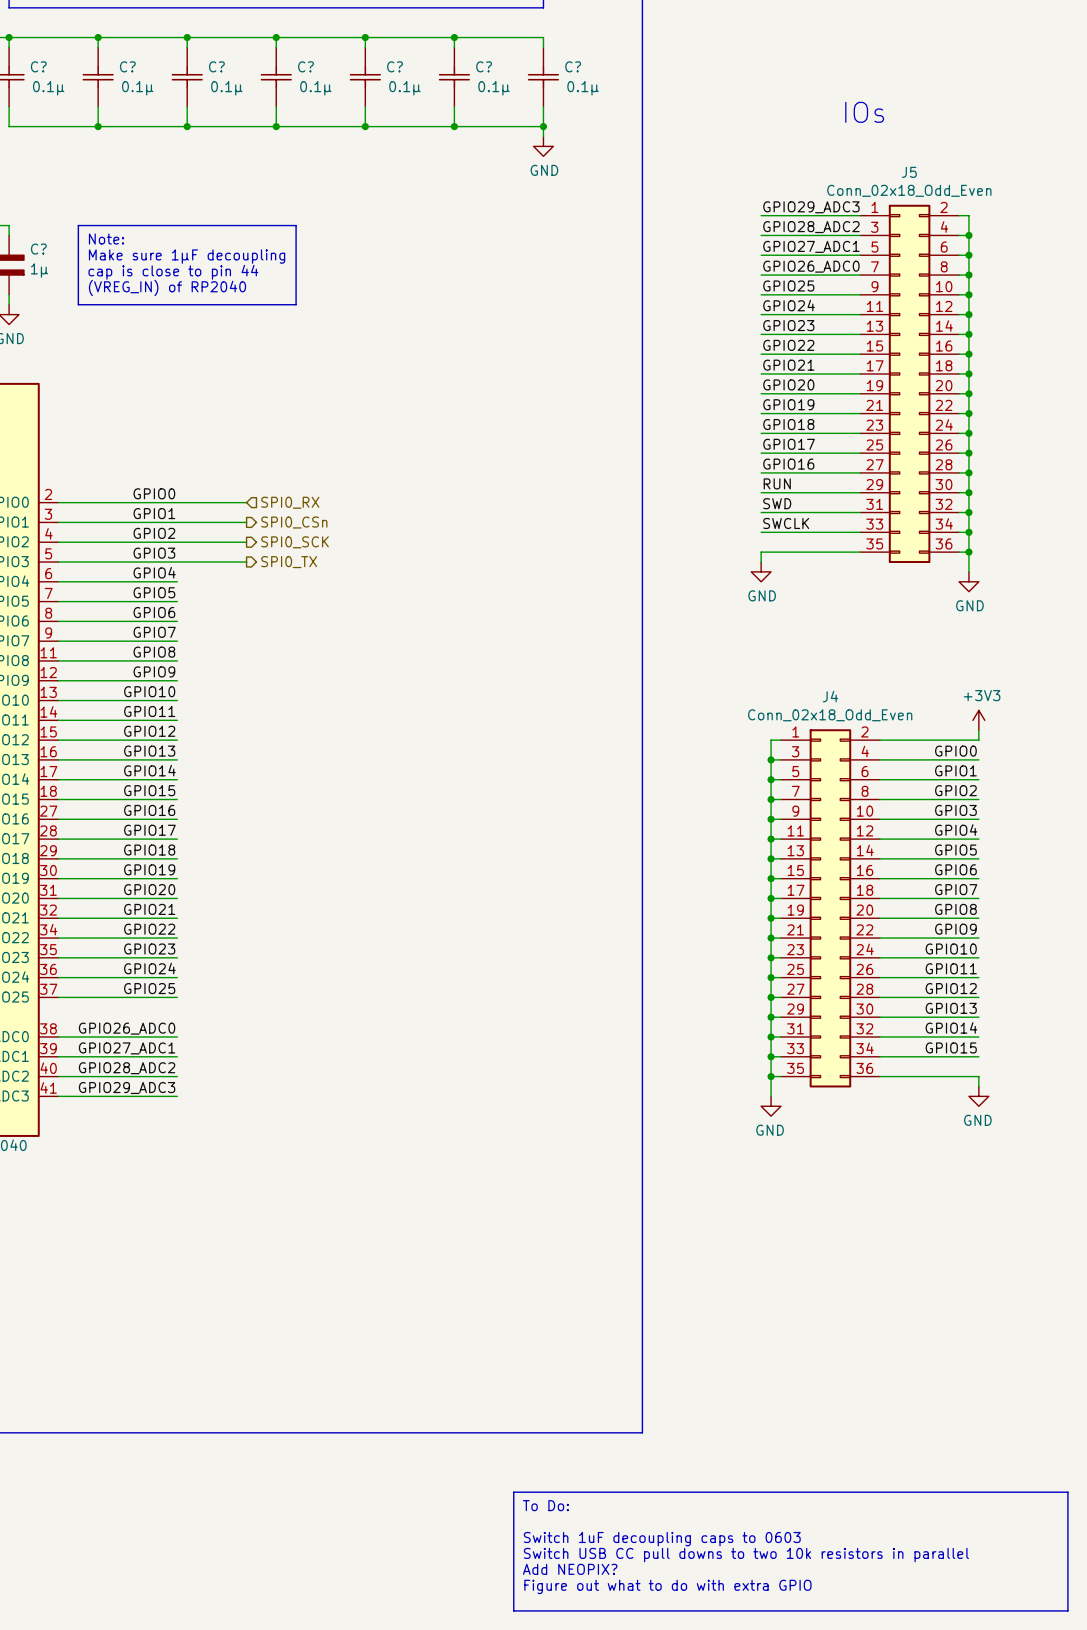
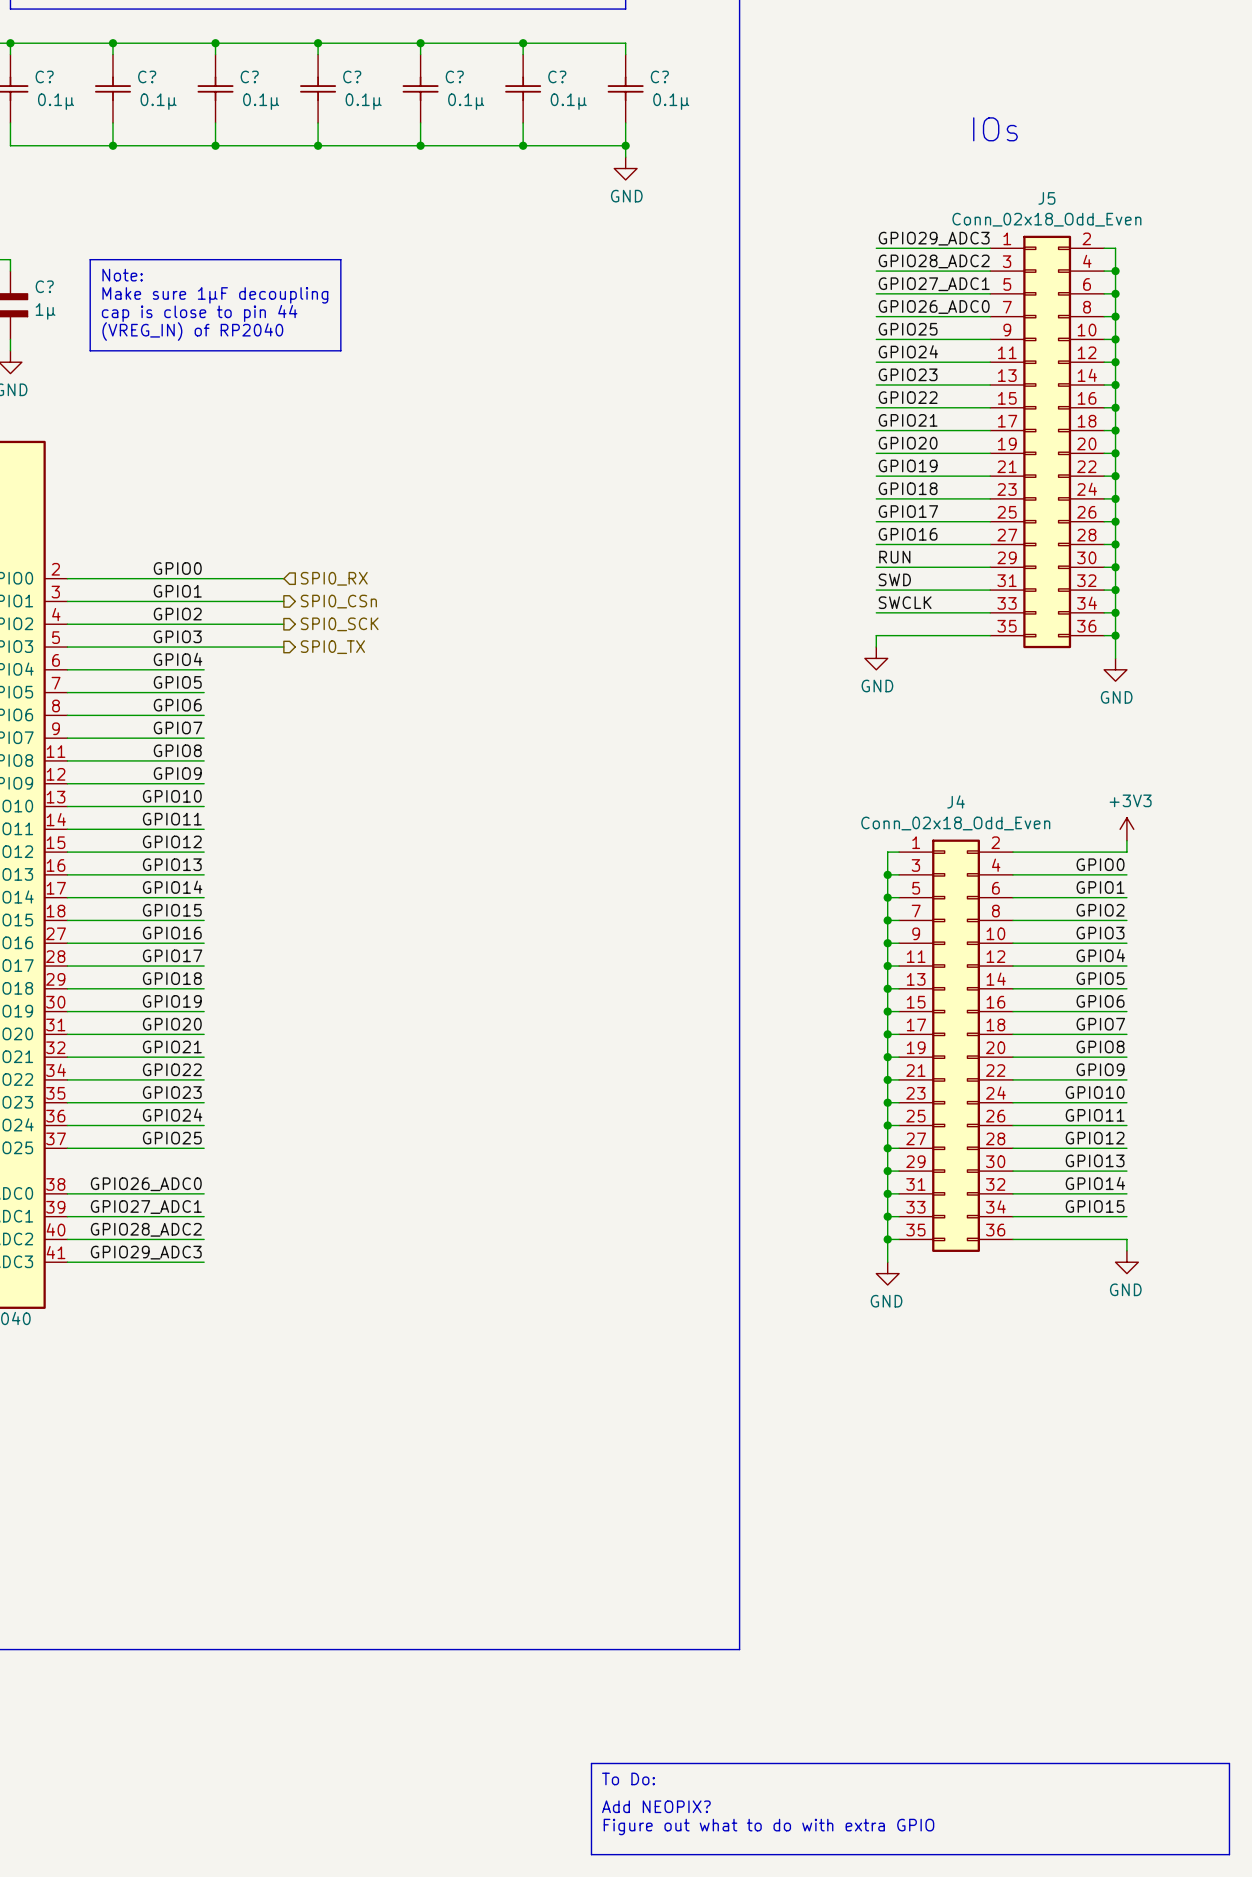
text position: To Do: (545, 1505) -> To Do: (628, 1778)
line: (513, 1531) (513, 1492) (1067, 1492) (1067, 1531) -> (591, 1763) (1229, 1763)
text: Switch 1uF decoupling caps to 0603 (662, 1539) -> none
text: Switch USB CC pull downs to two 10k resistors in parallel (746, 1555) -> none

